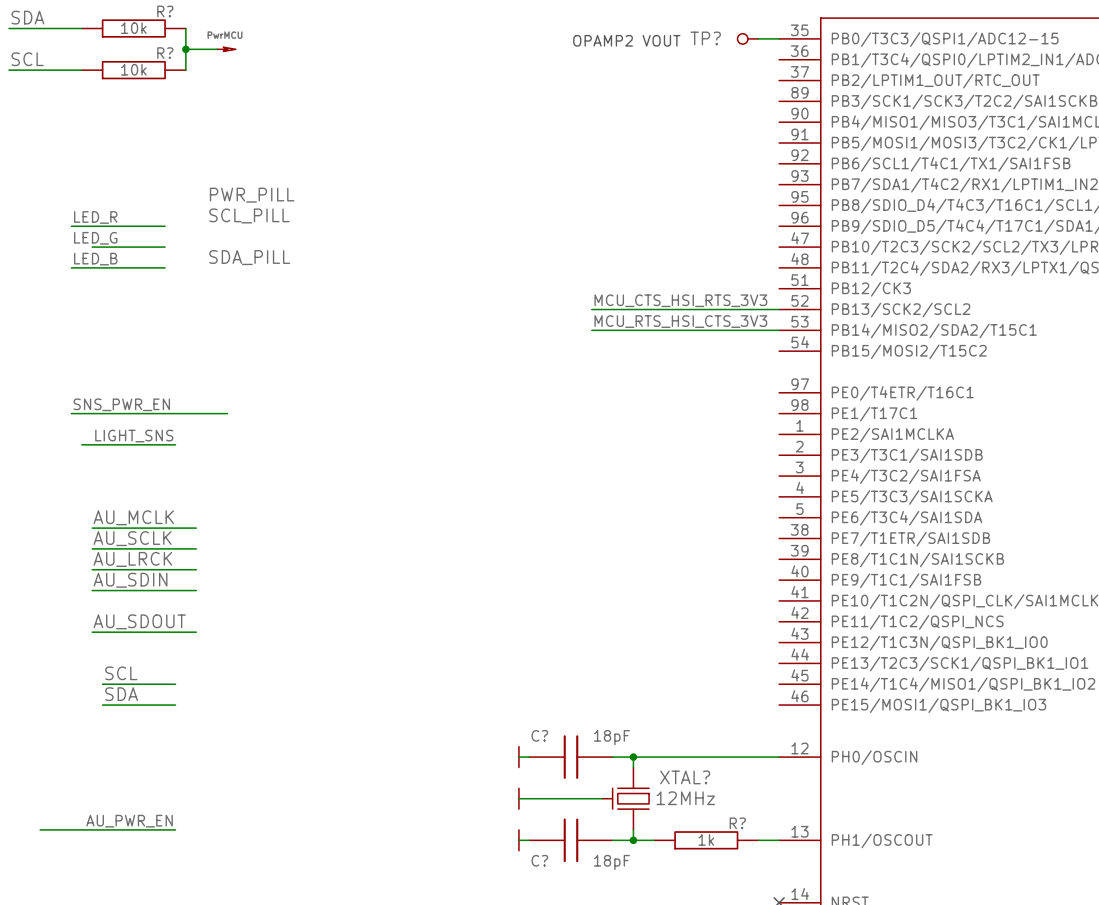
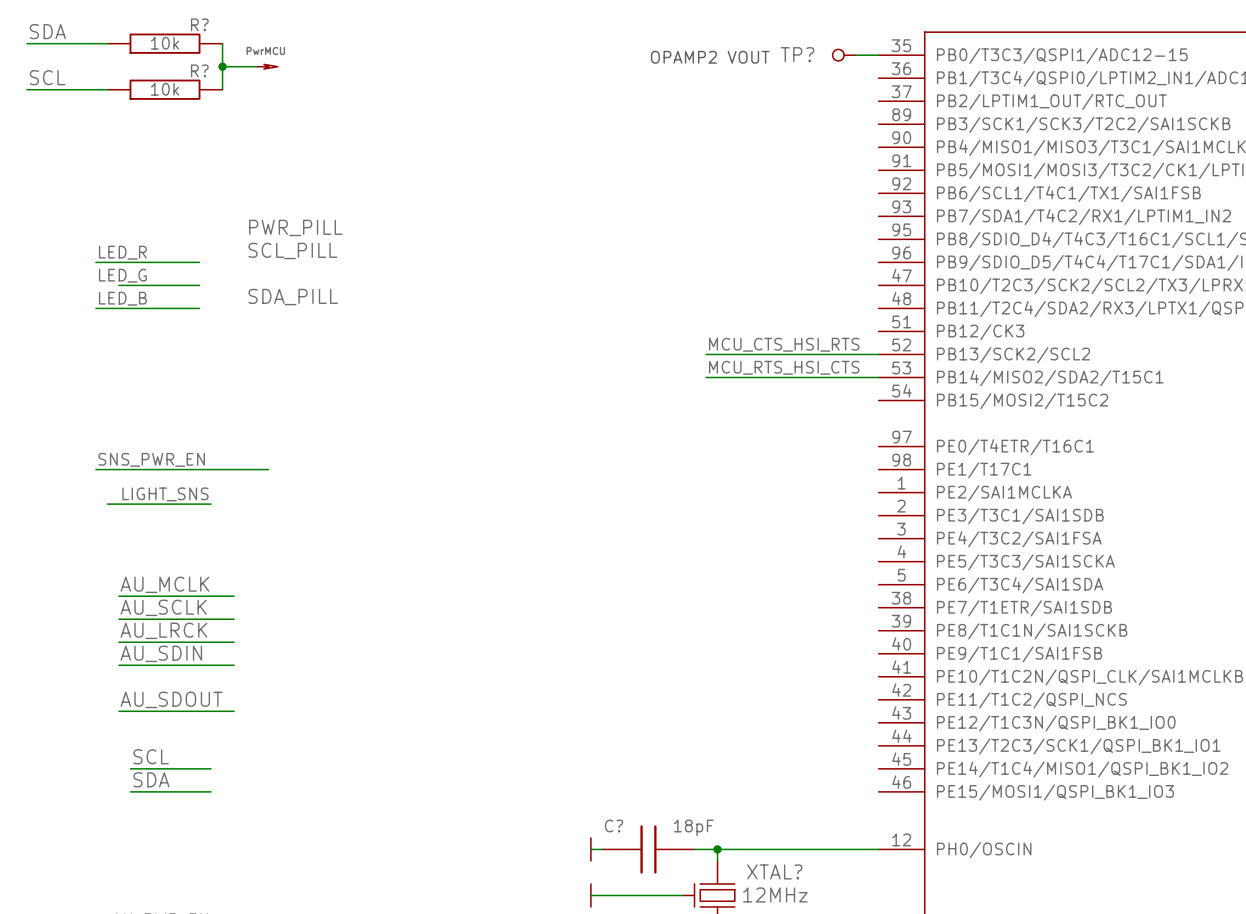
label: MCU_CTS_HSI_RTS_3V3 (680, 300) -> none
label: none -> MCU_CTS_HSI_RTS (784, 344)
wire: (591, 309) (623, 309) -> none
label: MCU_RTS_HSI_CTS_3V3 (680, 321) -> none
label: none -> MCU_RTS_HSI_CTS (784, 367)
wire: (591, 330) (623, 330) -> none

